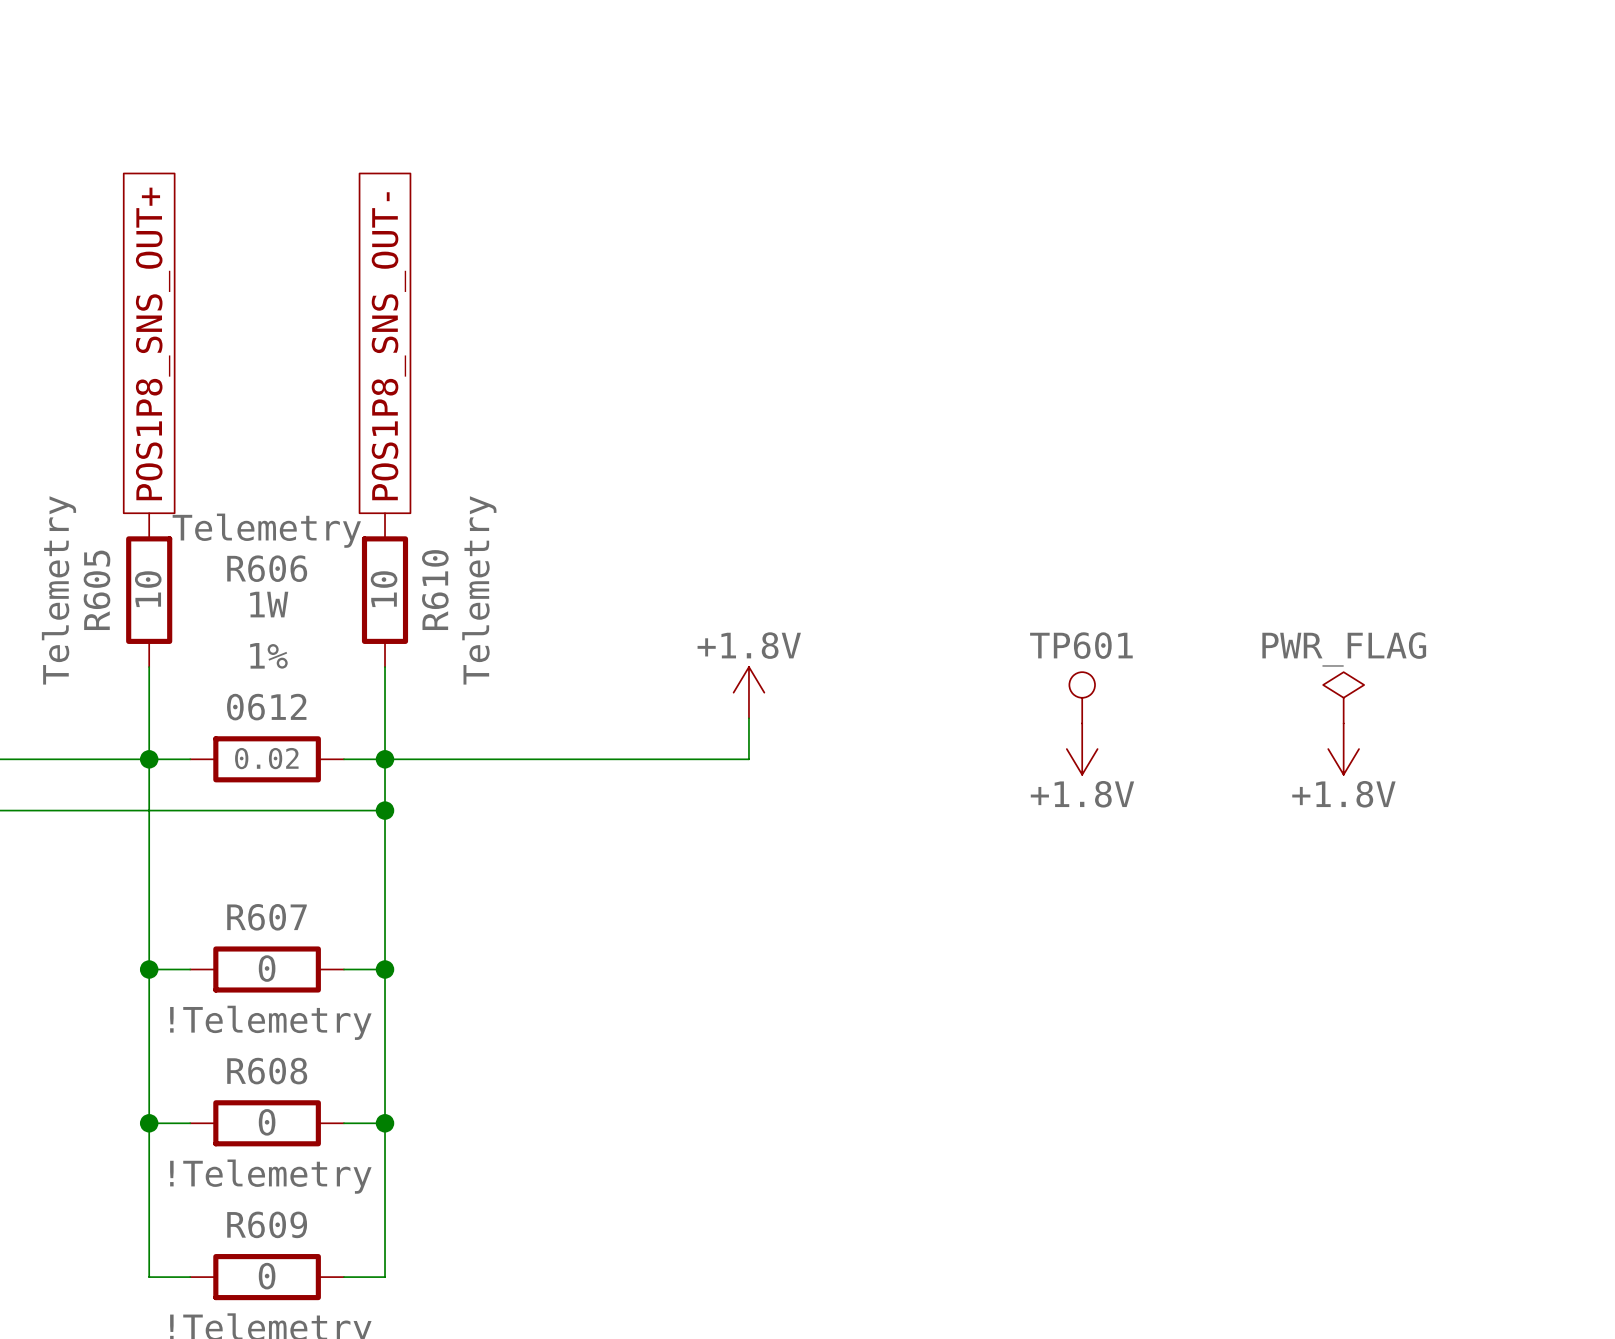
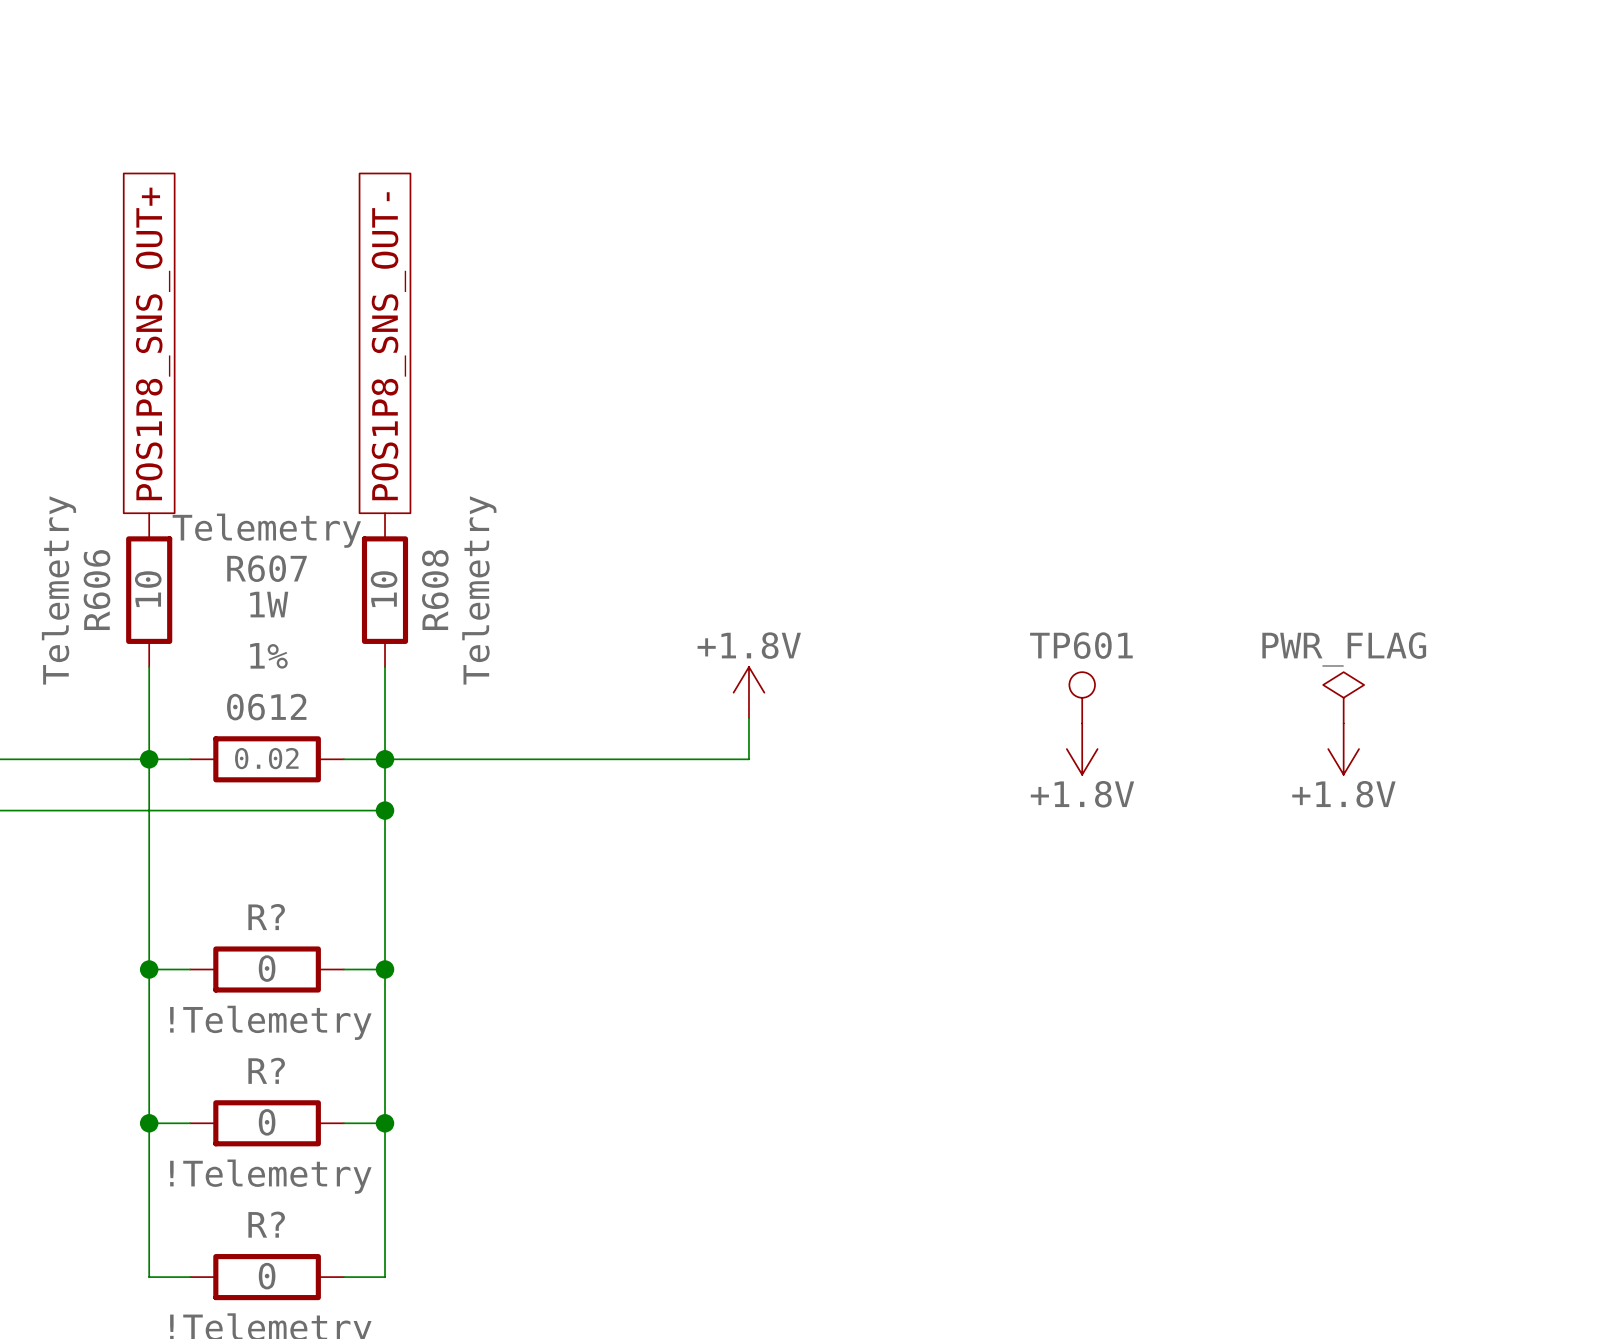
R606 name: R606 (267, 568) -> R607 (267, 568)
R605 name: R605 (96, 590) -> R606 (96, 590)
R610 name: R610 (435, 590) -> R608 (435, 590)
R607 name: R607 (267, 917) -> R? (266, 917)
R608 name: R608 (267, 1071) -> R? (266, 1070)
R609 name: R609 (267, 1224) -> R? (266, 1224)

